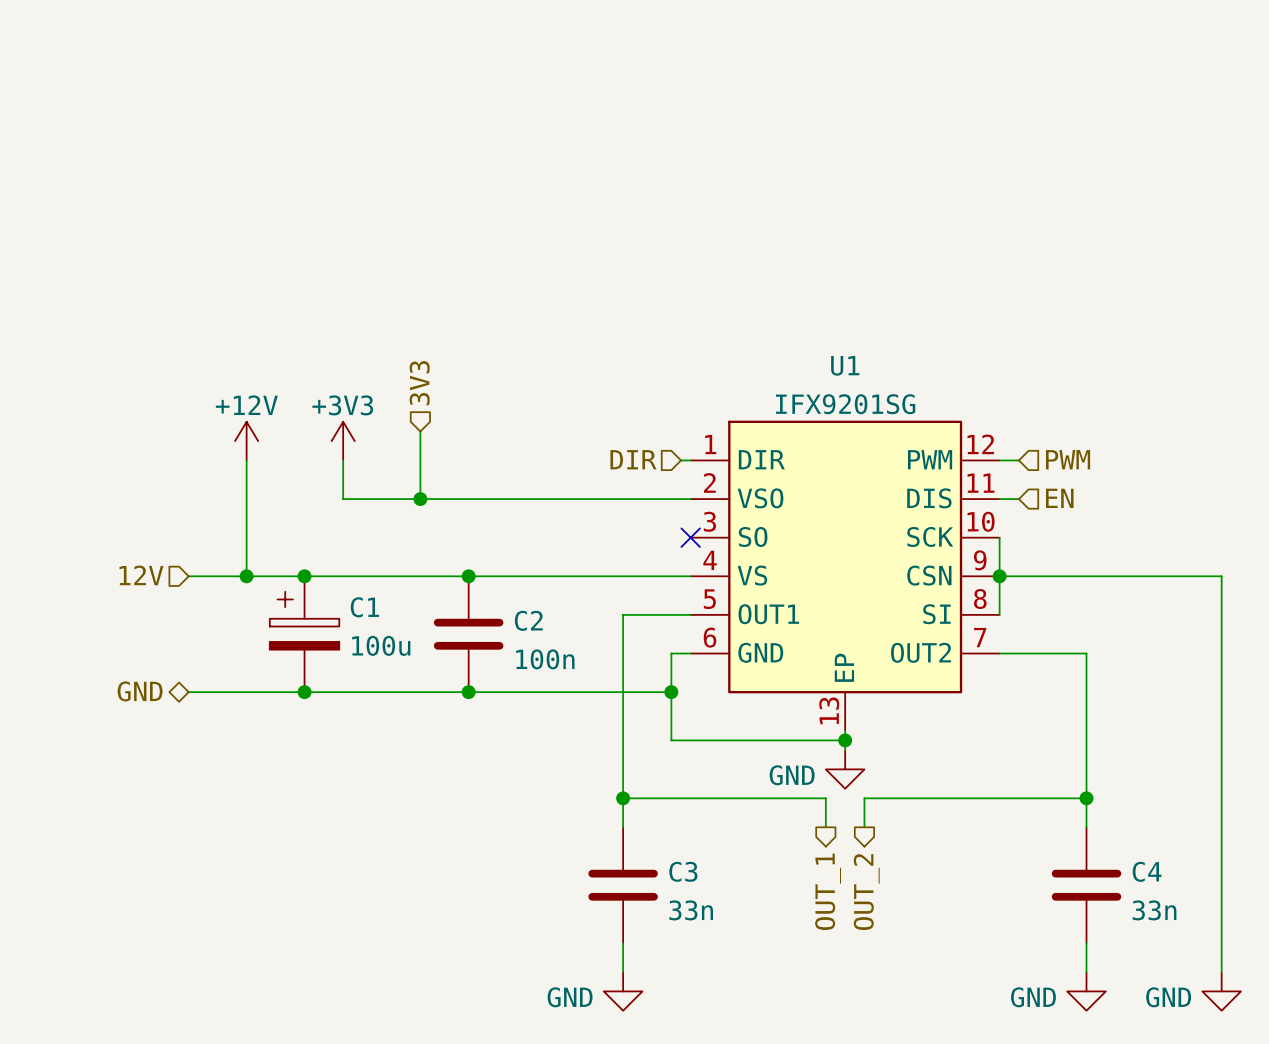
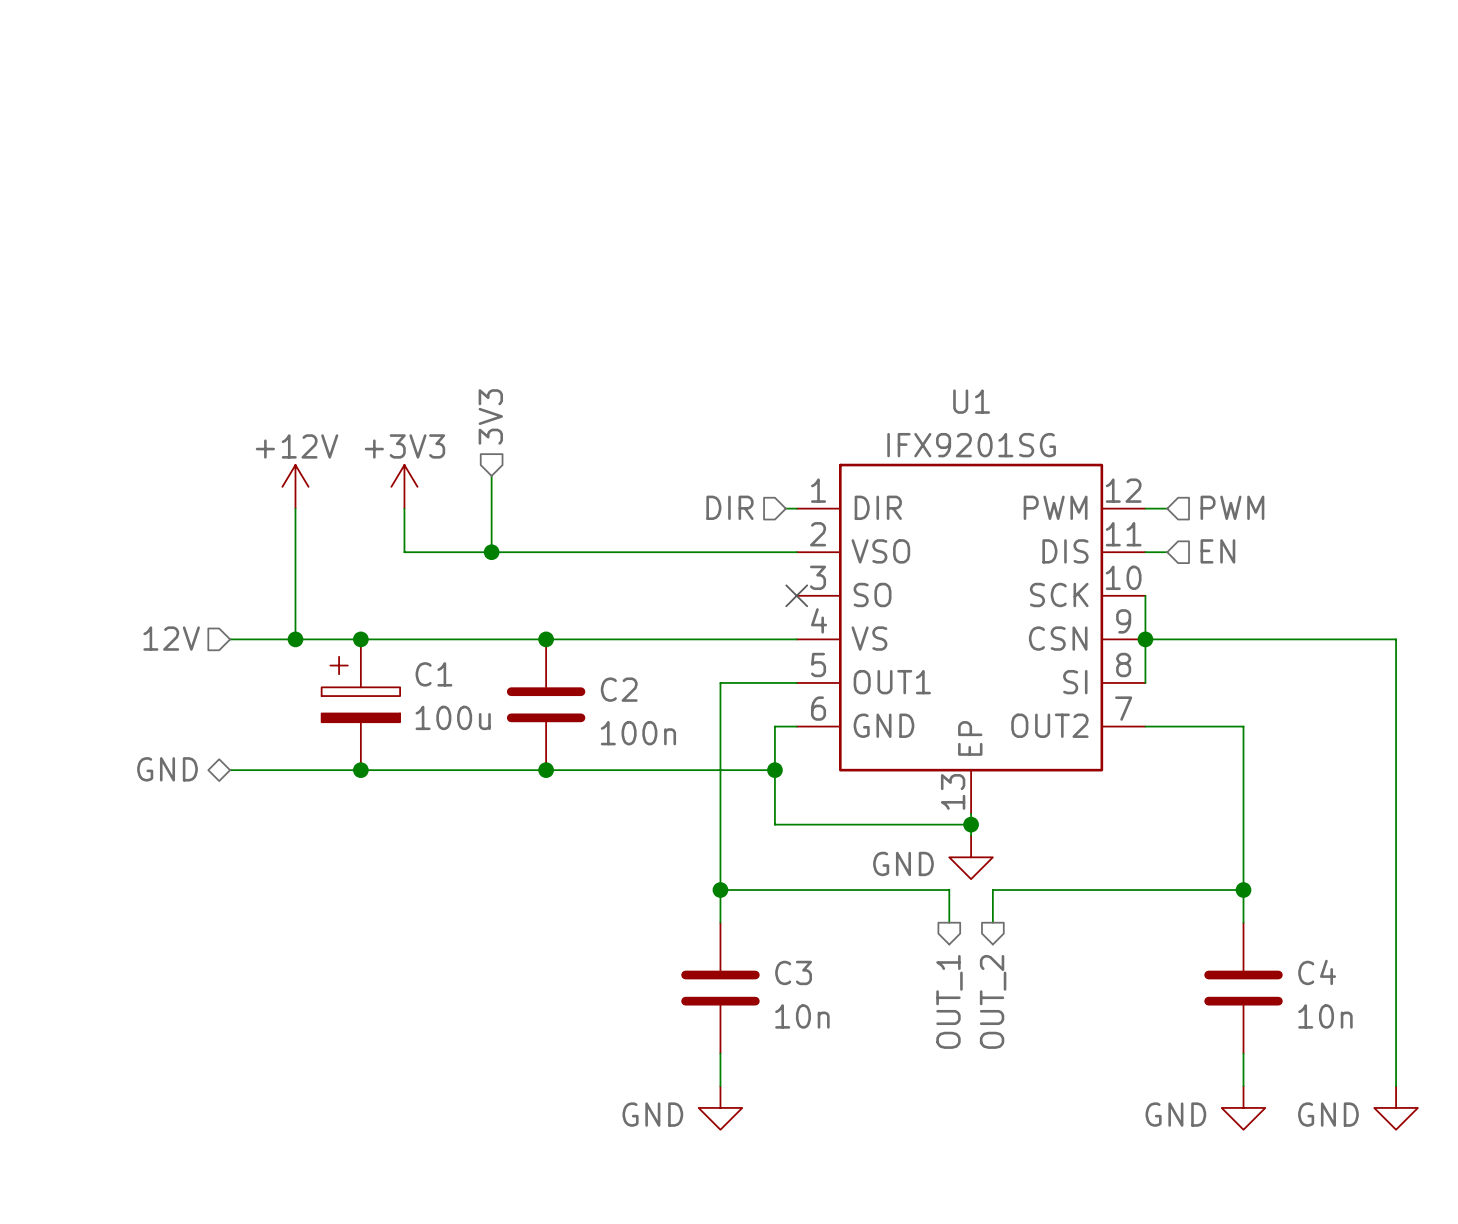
C3 value: 33n (691, 910) -> 10n (802, 1016)
C4 value: 33n (1154, 910) -> 10n (1325, 1016)

